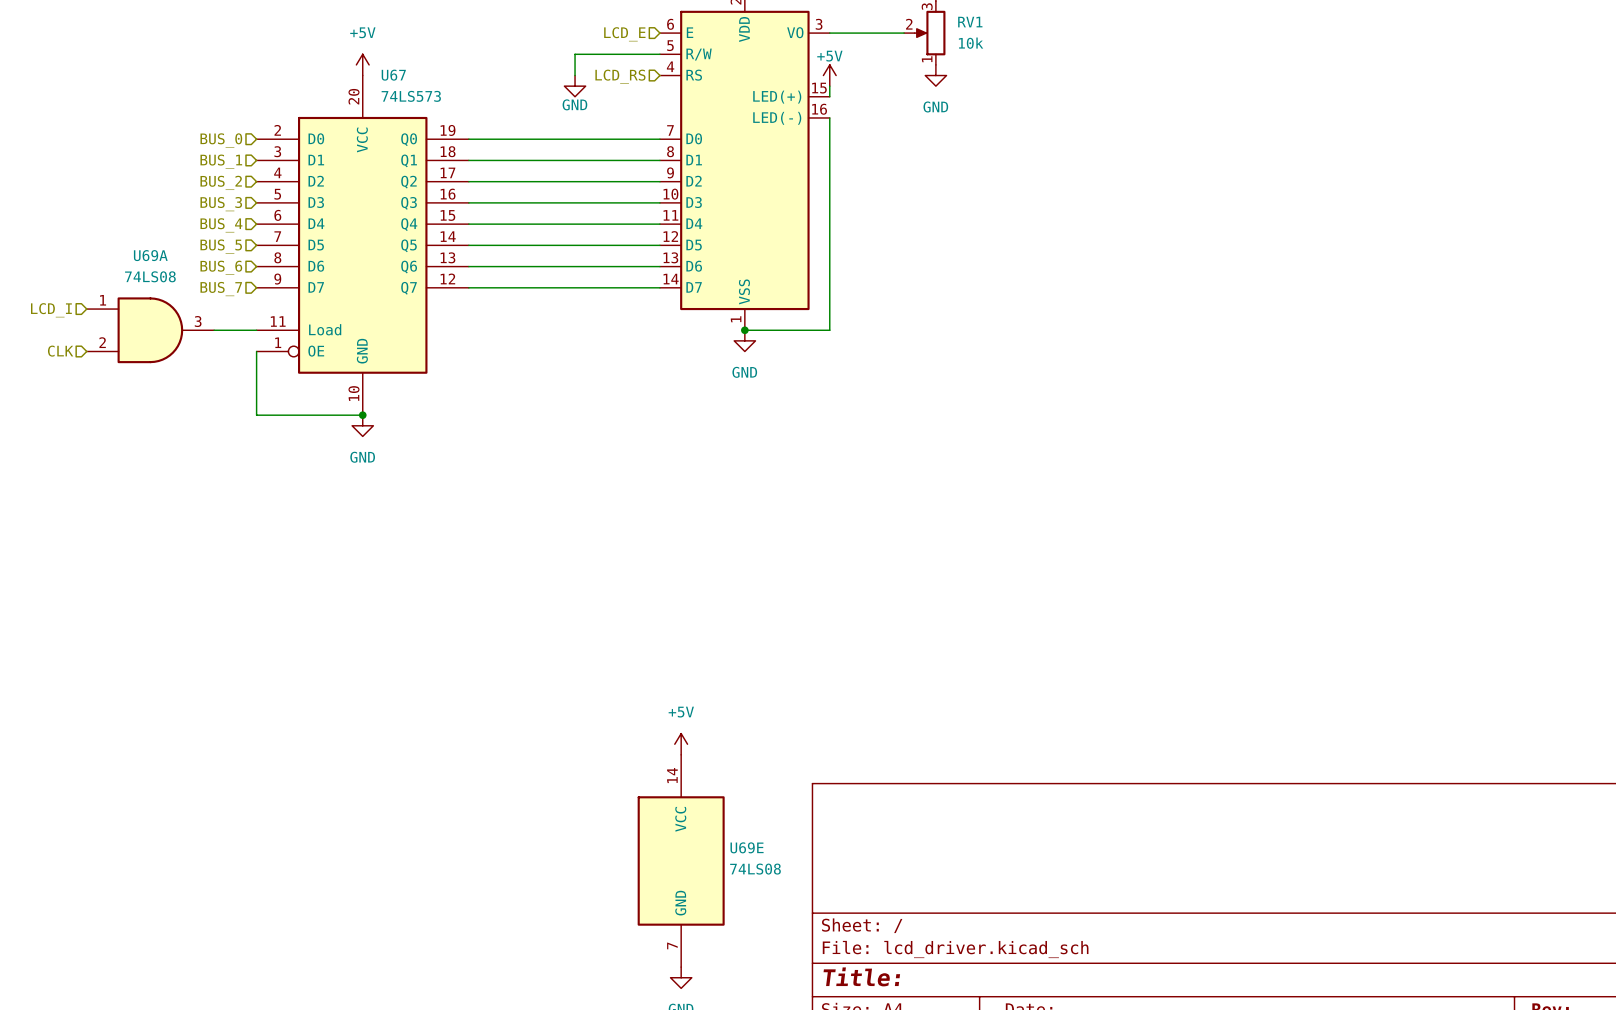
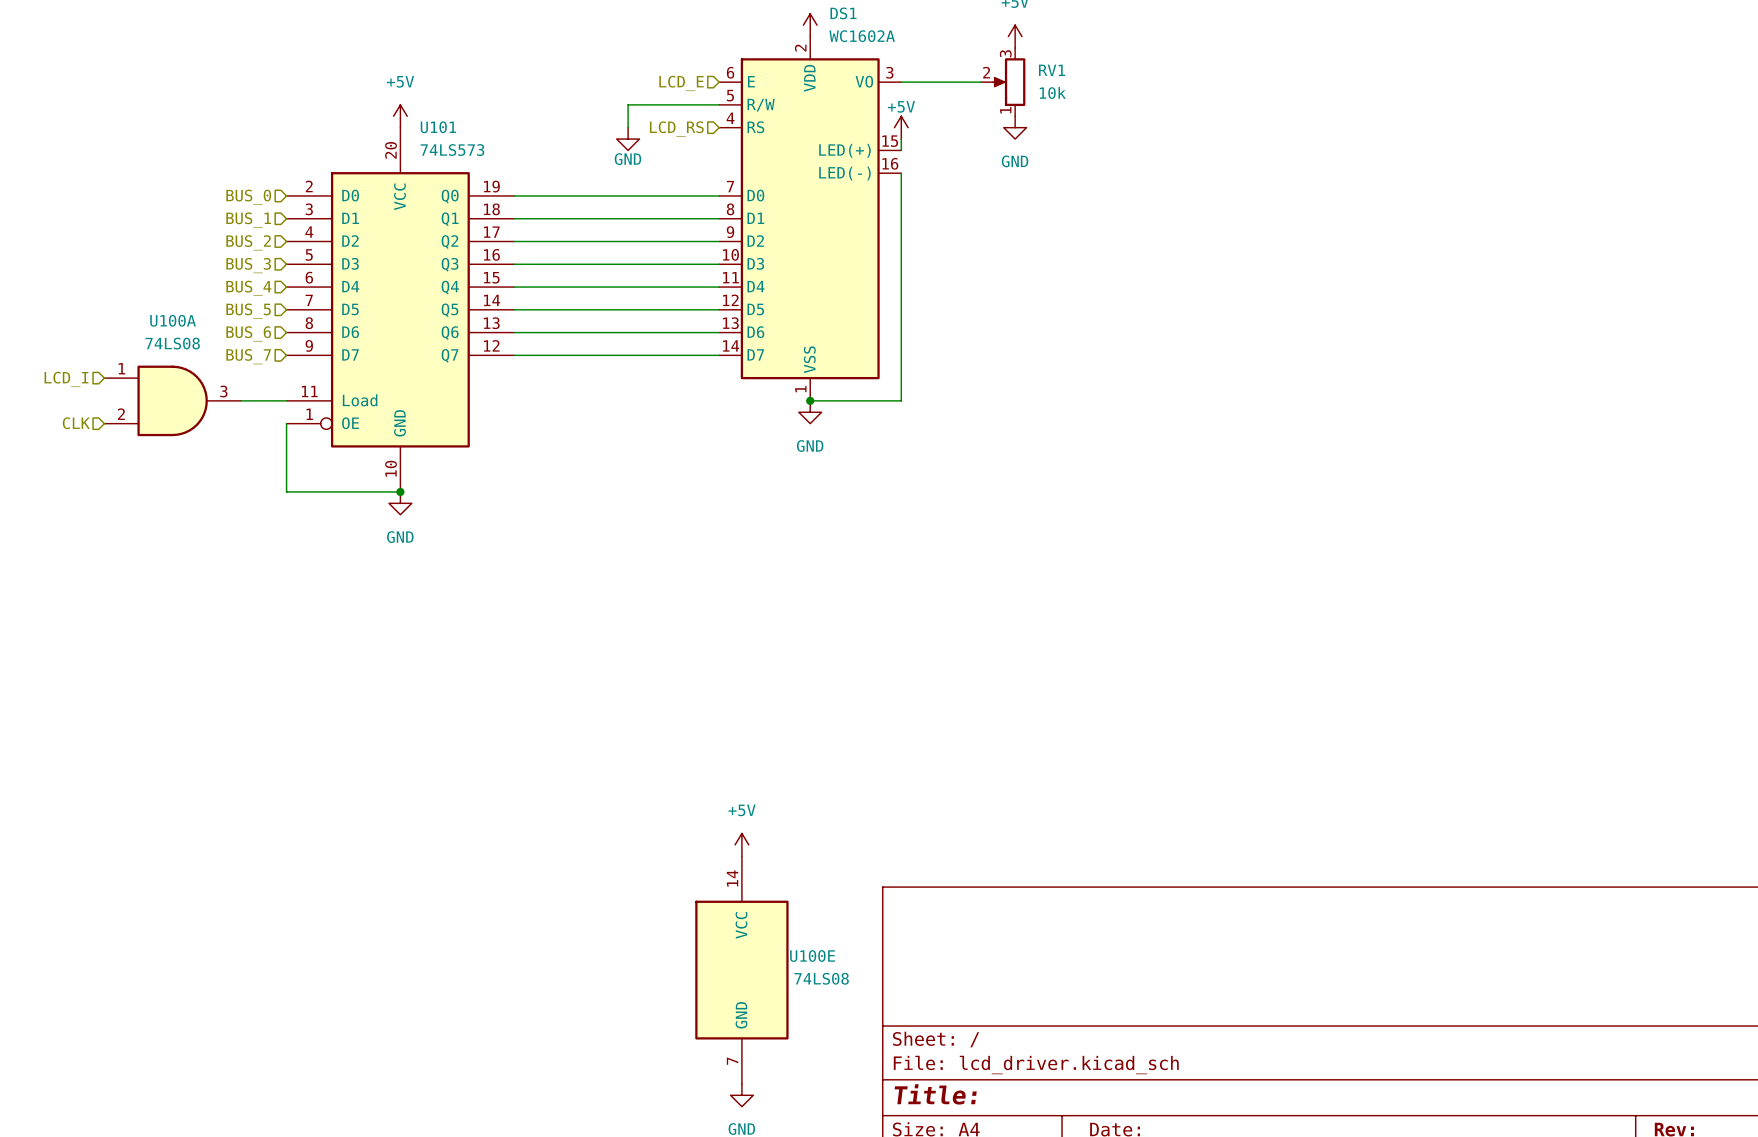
U67 name: U67 (393, 75) -> U101 (438, 127)
U69A name: U69A (150, 255) -> U100A (173, 320)
U69E name: U69E (747, 847) -> U100E (812, 956)

